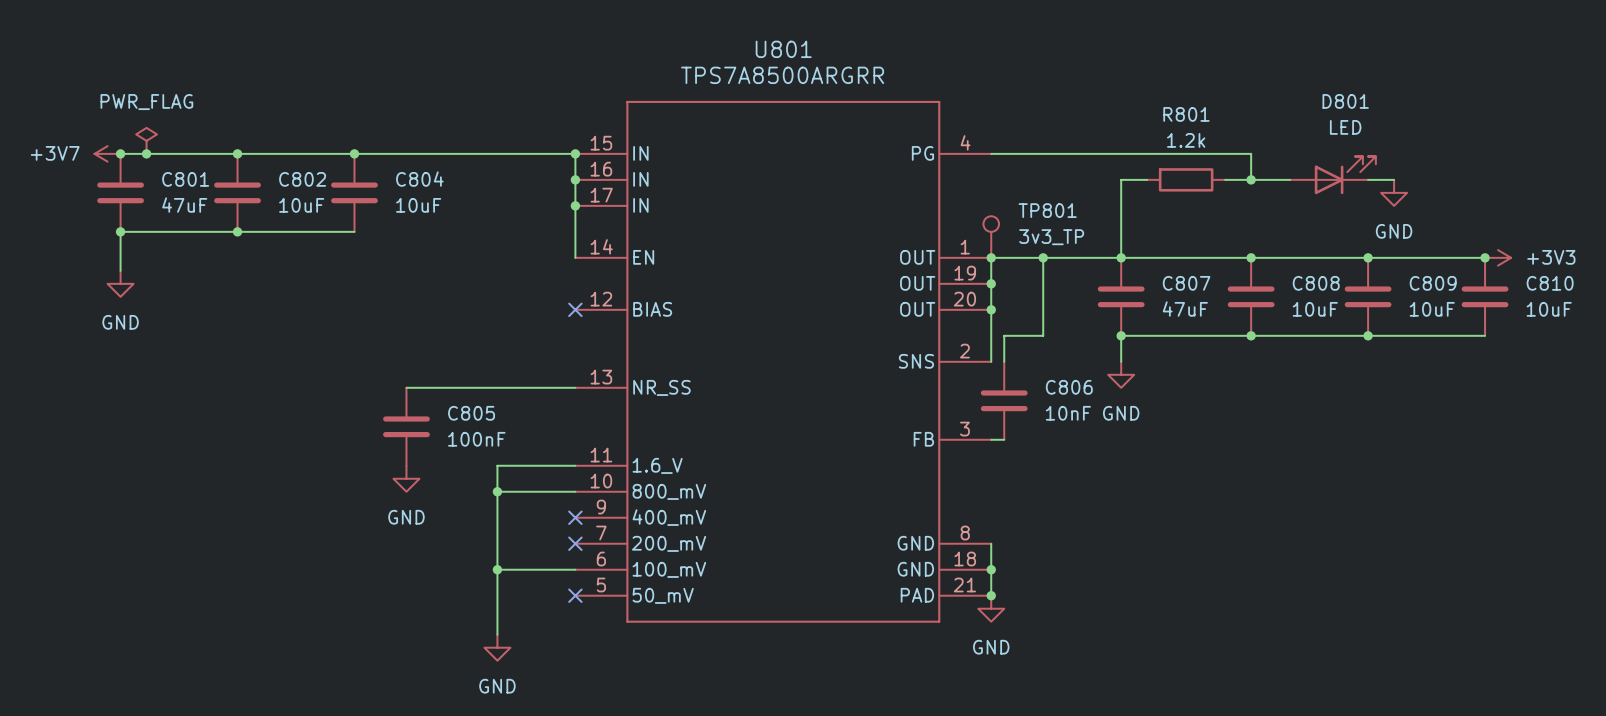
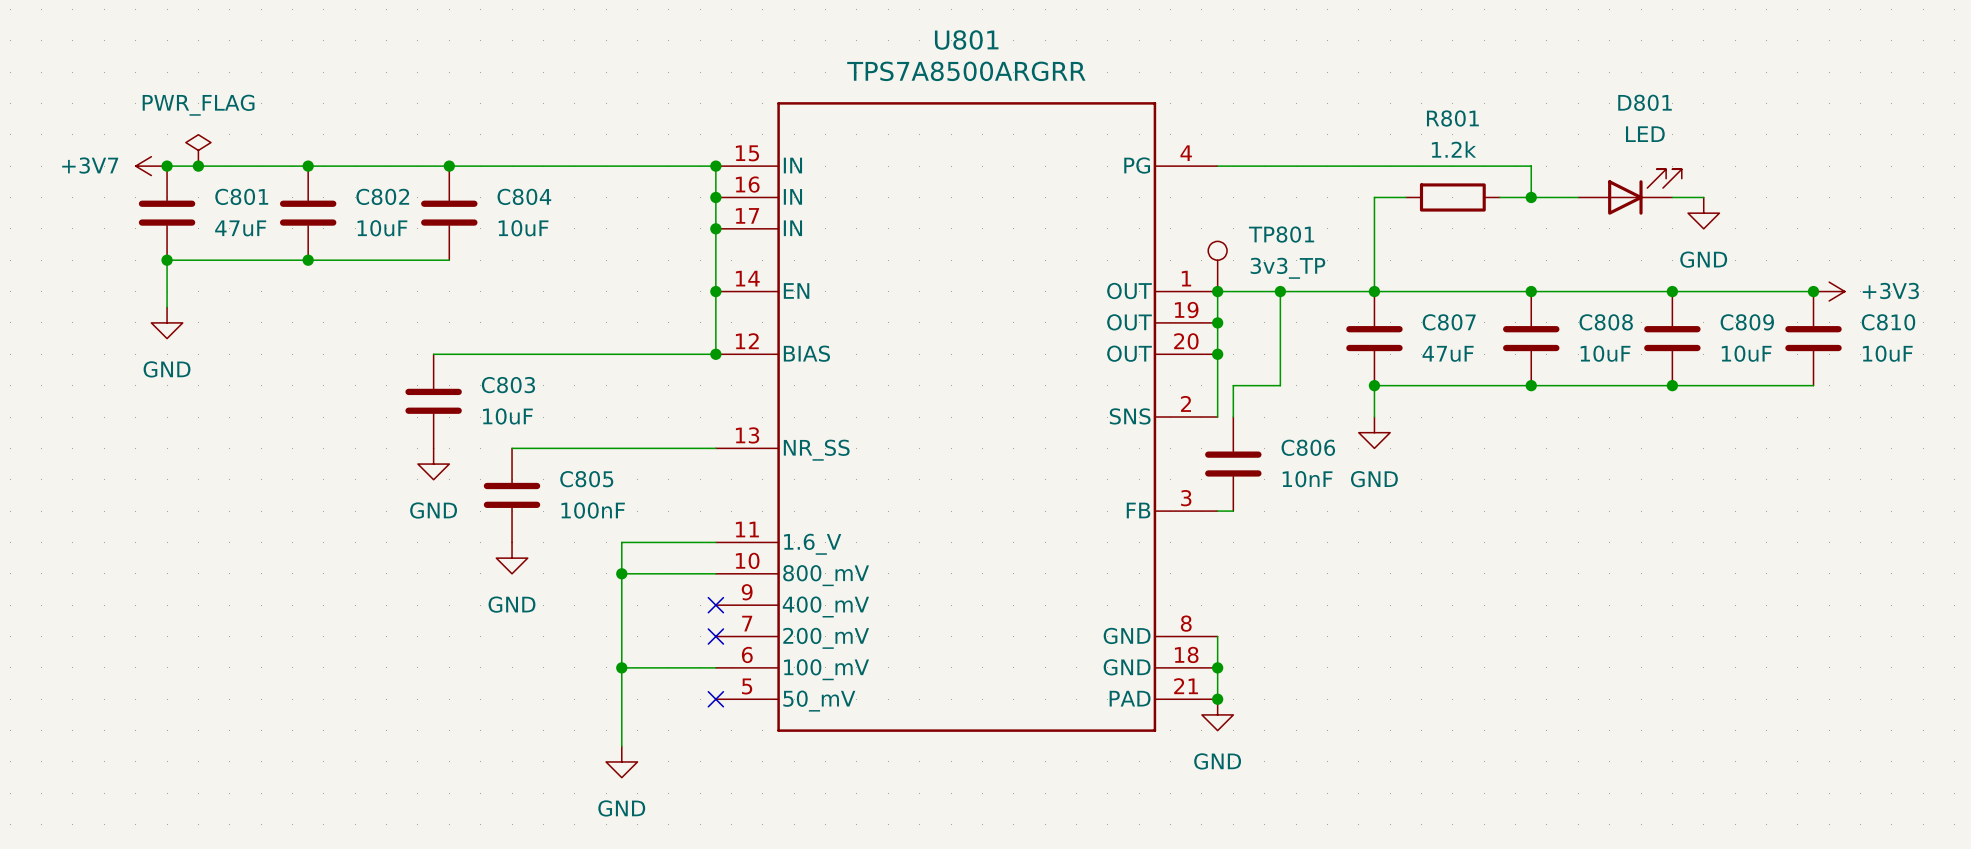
wire: none -> (715, 291) (715, 354) (433, 354)
junction: none -> (715, 291)
no-connect mark: (575, 309) -> none
junction: none -> (715, 354)
C803: none -> 10uF (433, 401)
power symbol: none -> GND (433, 464)

